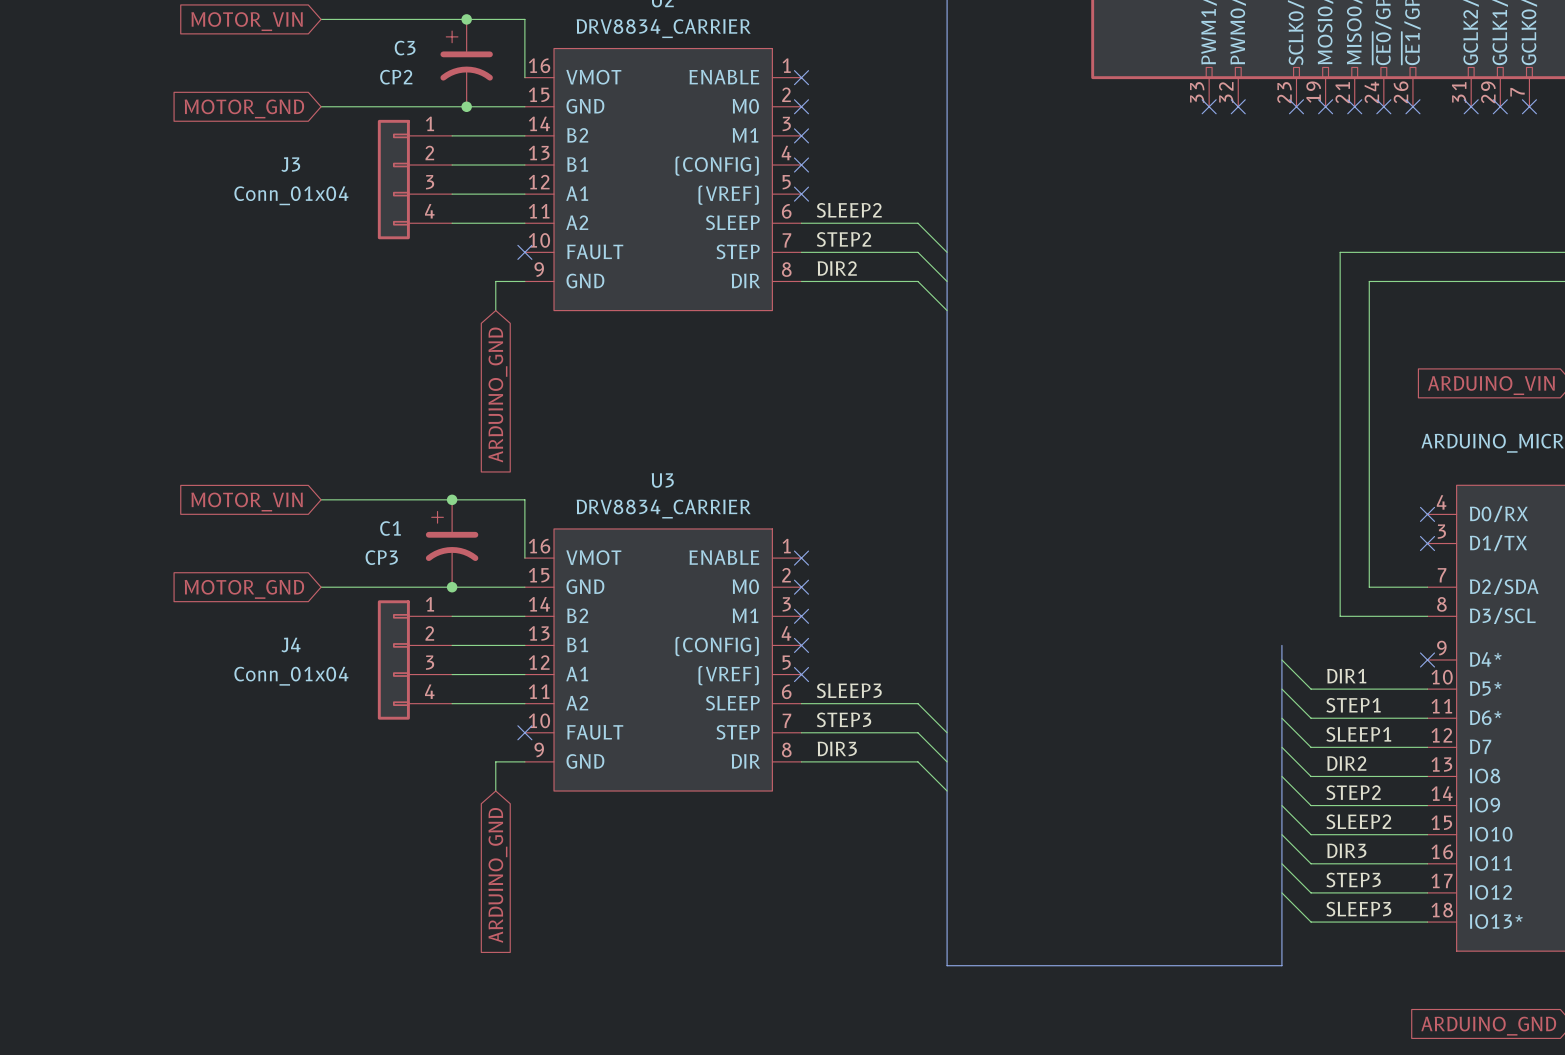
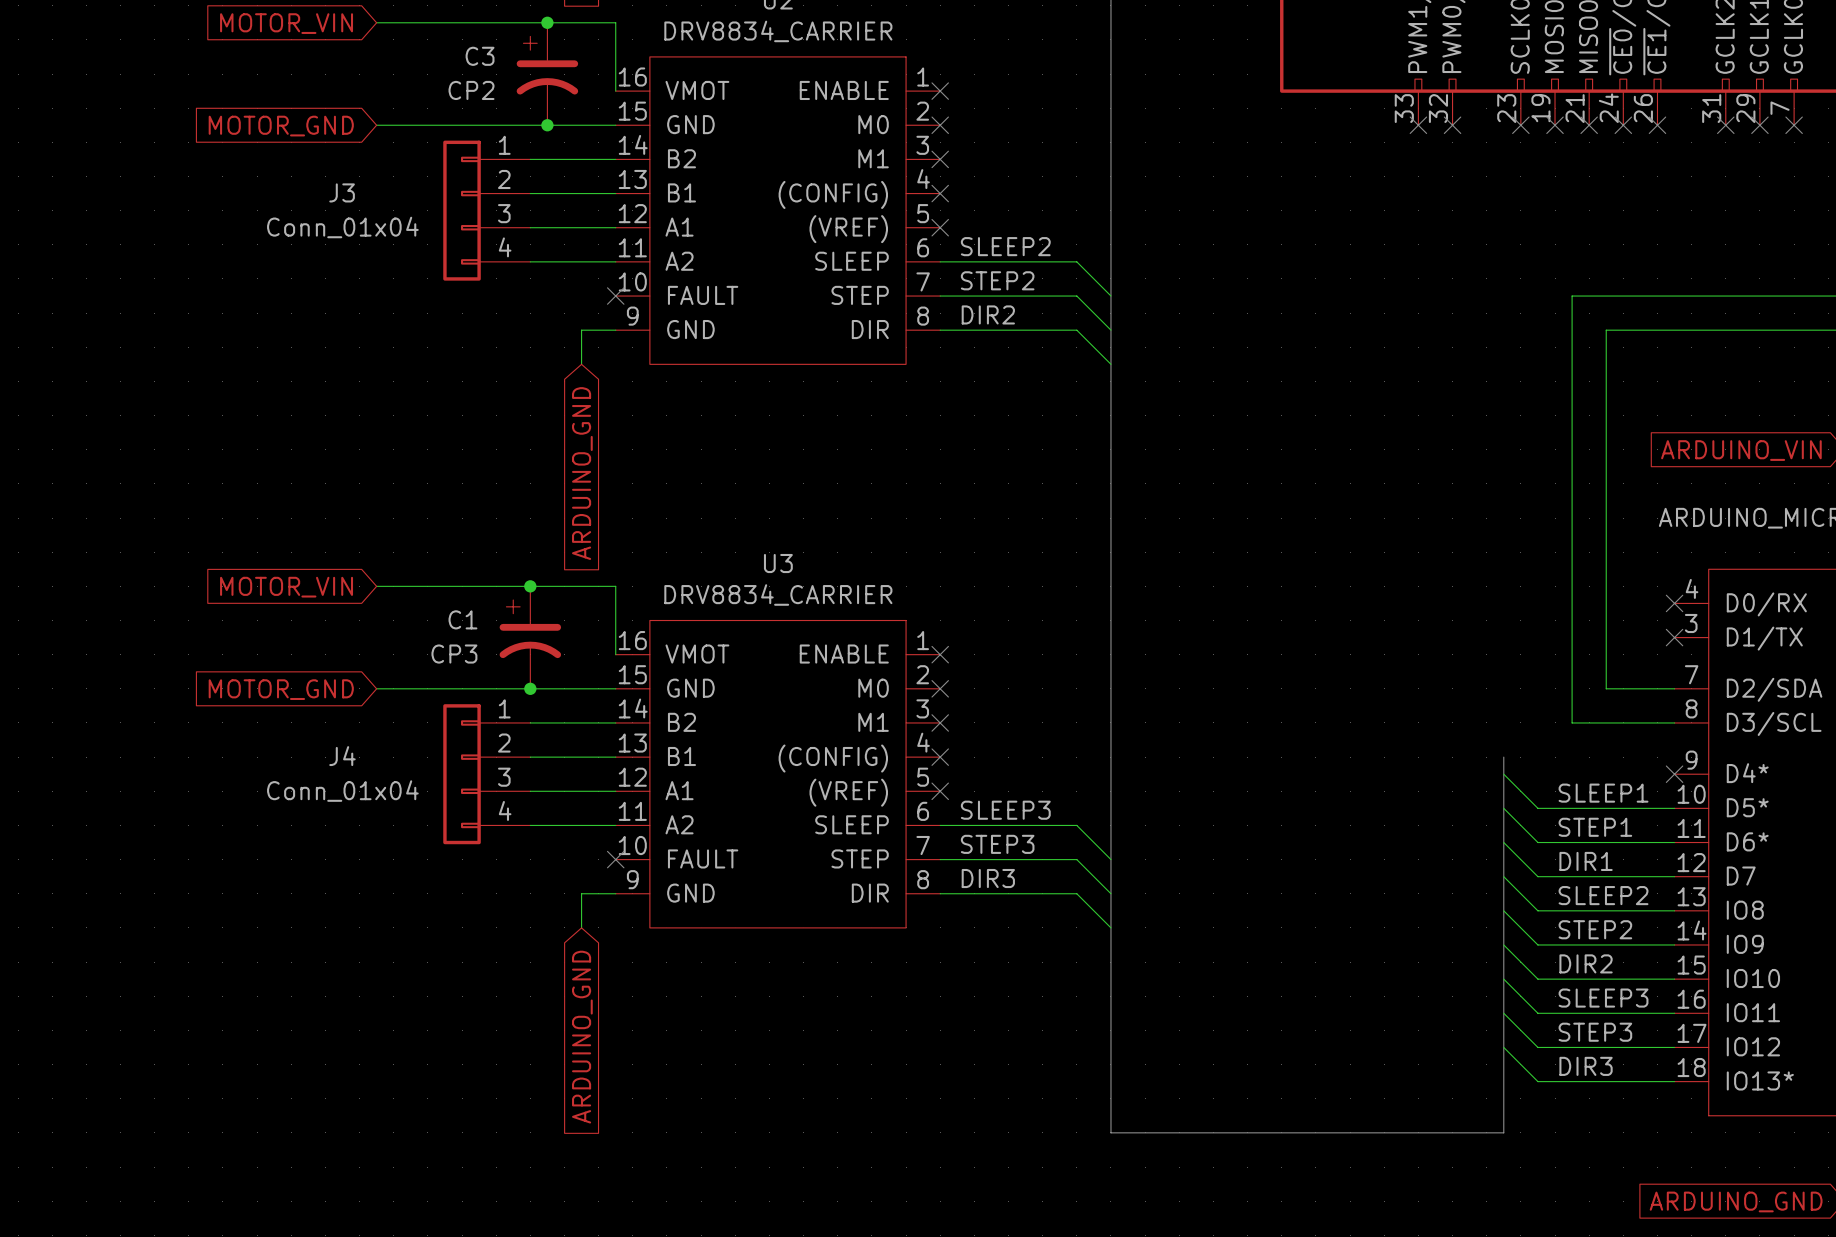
label: DIR1 (1346, 676) -> SLEEP1 (1603, 793)
label: SLEEP1 (1358, 734) -> DIR1 (1586, 861)
label: DIR2 (1346, 763) -> SLEEP2 (1603, 895)
label: SLEEP2 (1358, 821) -> DIR2 (1586, 963)
label: DIR3 (1346, 850) -> SLEEP3 (1603, 998)
label: SLEEP3 (1358, 909) -> DIR3 (1586, 1066)

